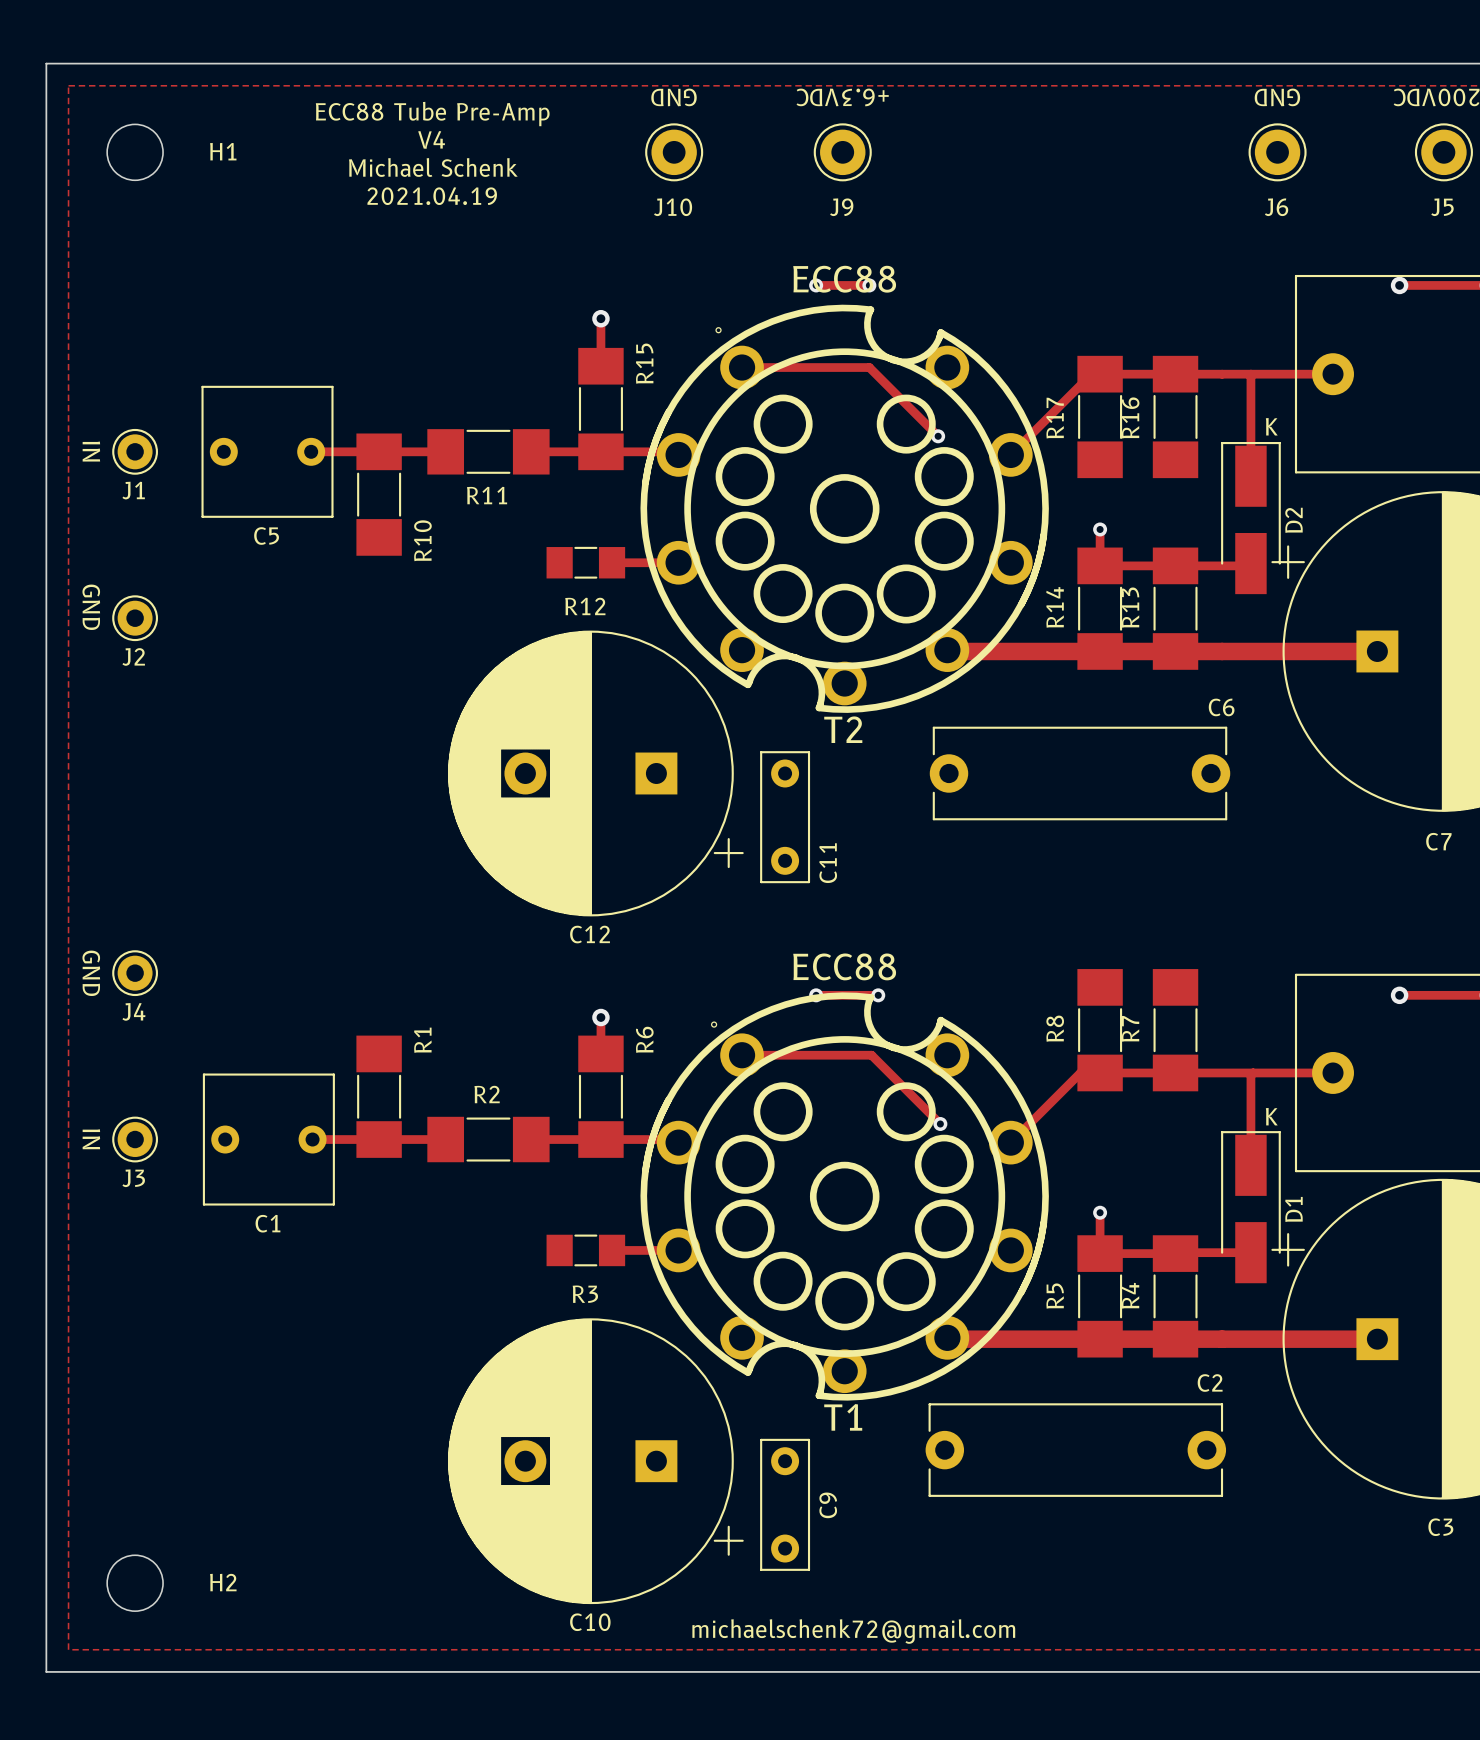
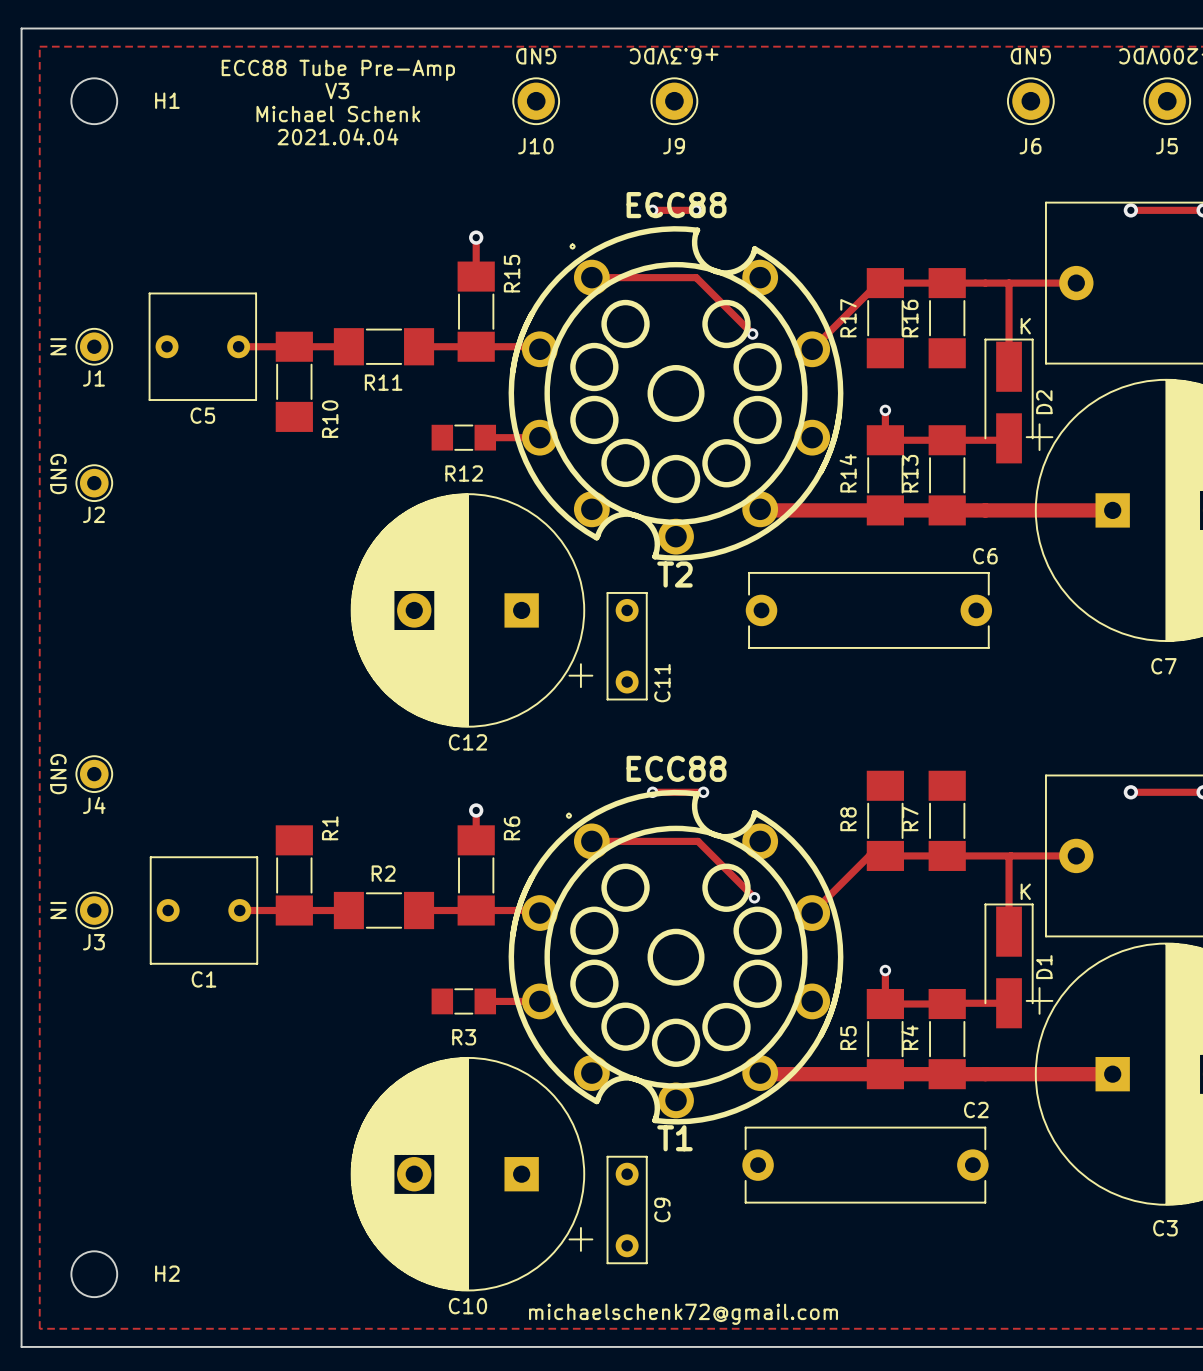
text: V4 (431, 139) -> V3 (337, 90)
text: 2021.04.19 (432, 196) -> 2021.04.04 (337, 136)

